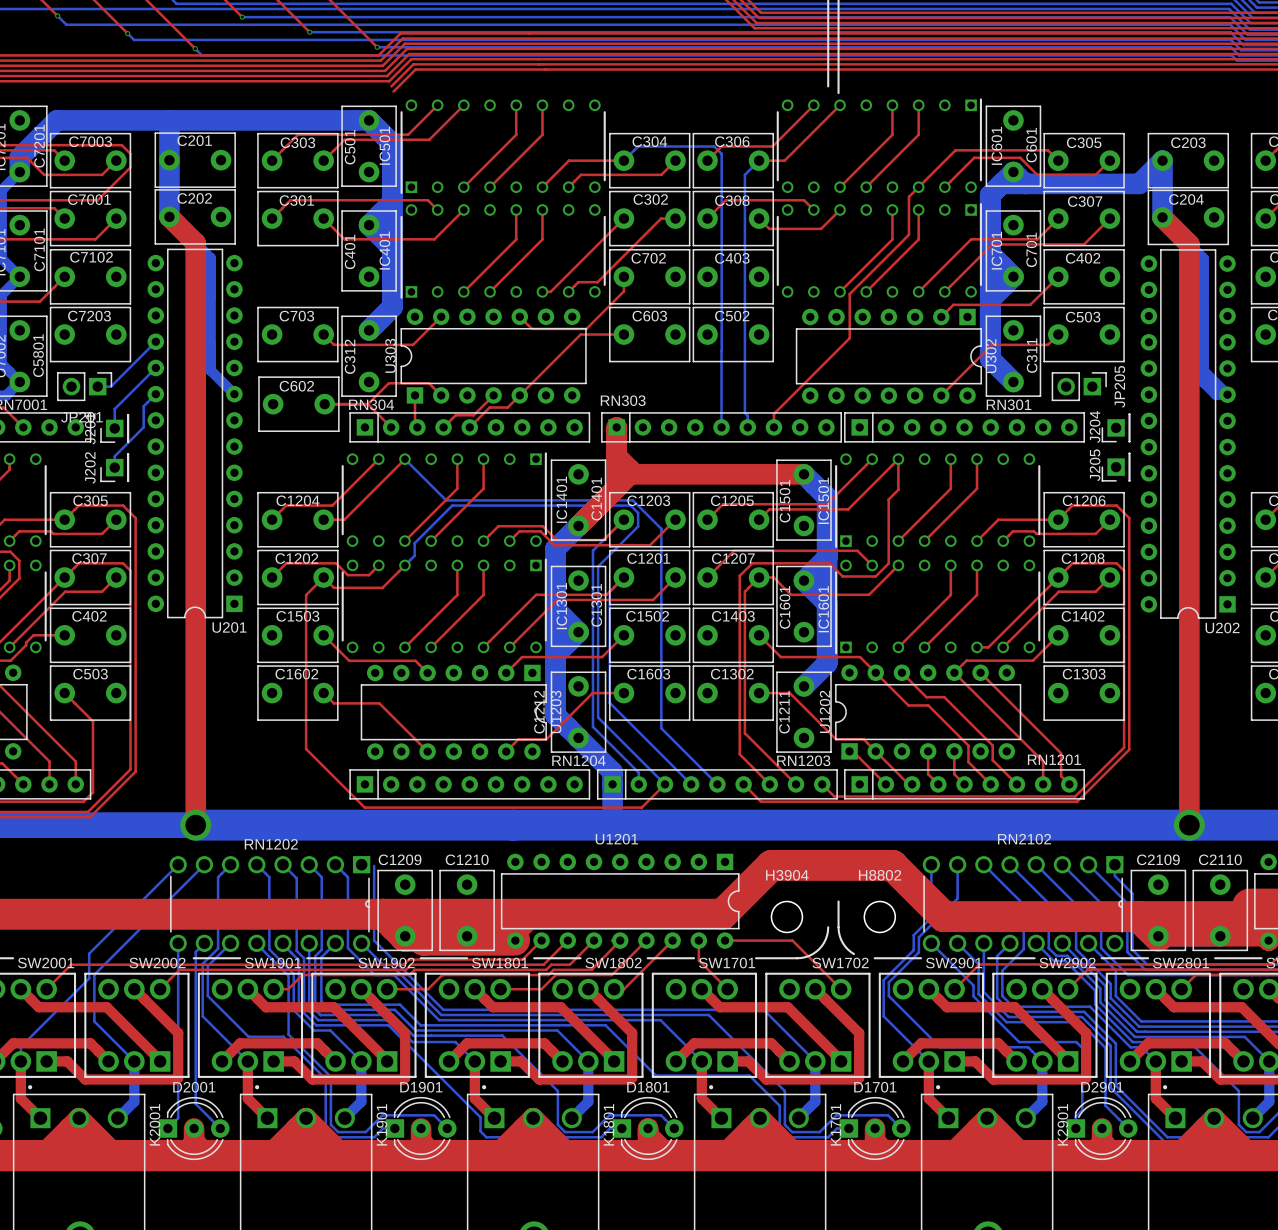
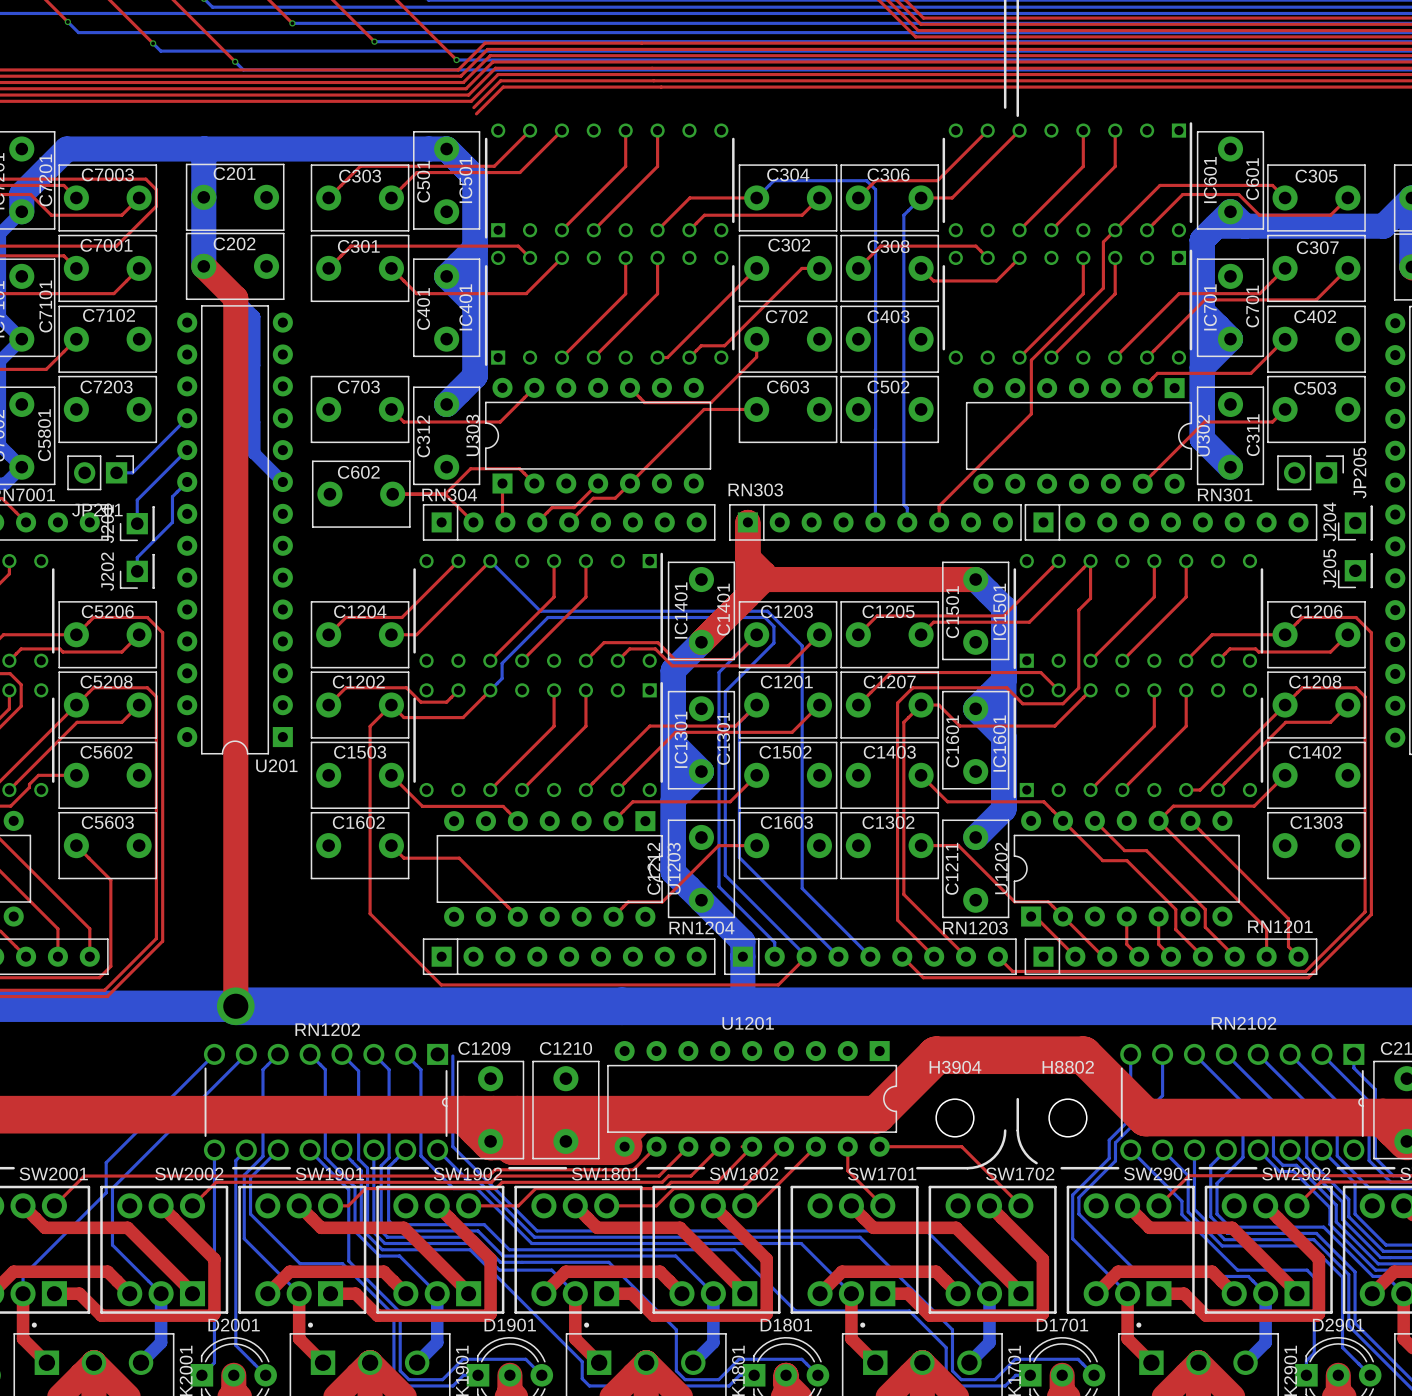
C305 name: C305 (90, 500) -> C5206 (107, 611)
C307 name: C307 (89, 558) -> C5208 (106, 681)
C402 name: C402 (89, 616) -> C5602 (106, 752)
C503 name: C503 (90, 674) -> C5603 (107, 822)

